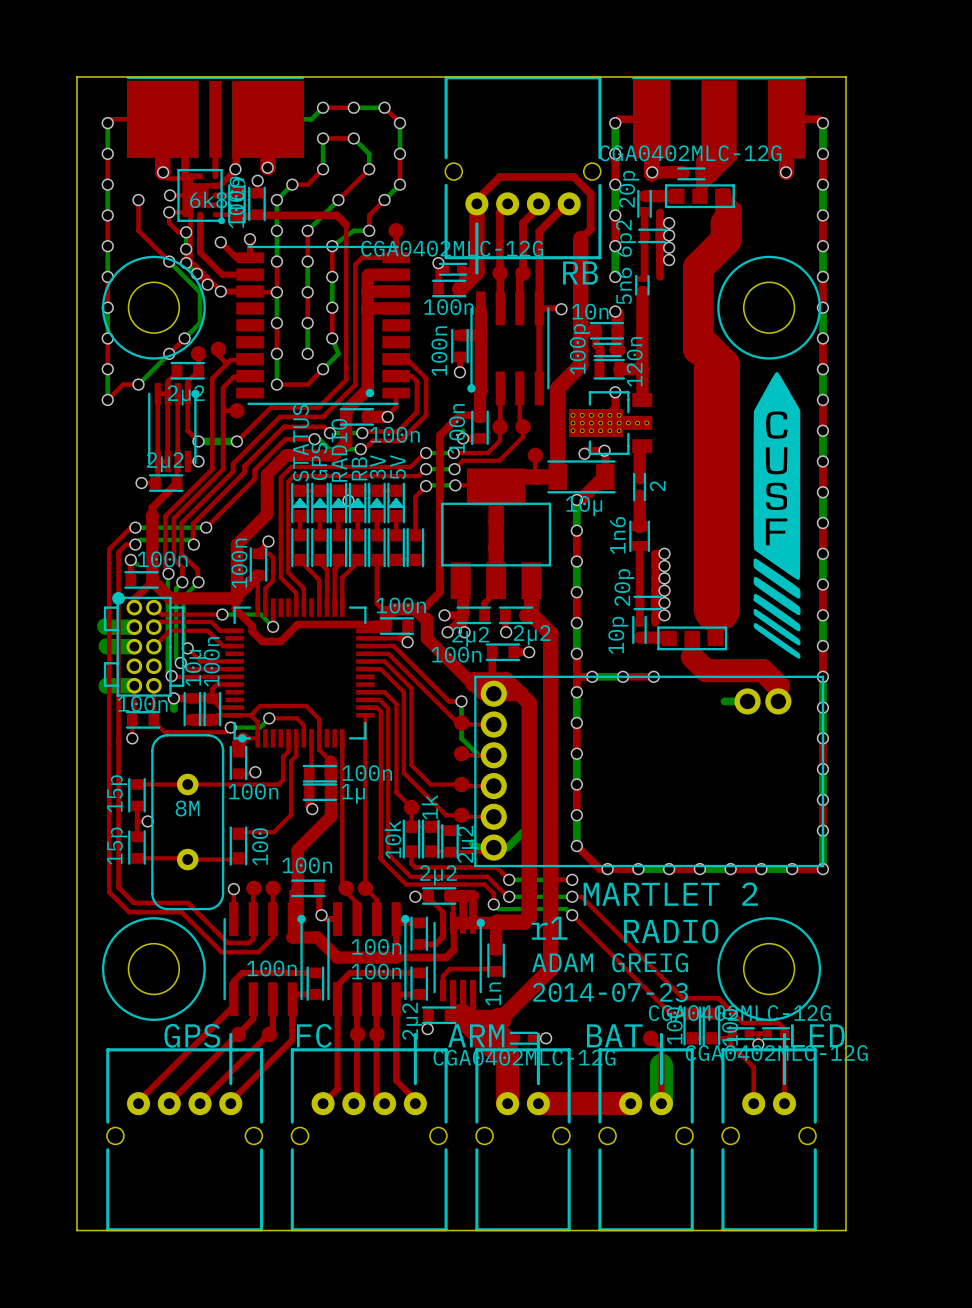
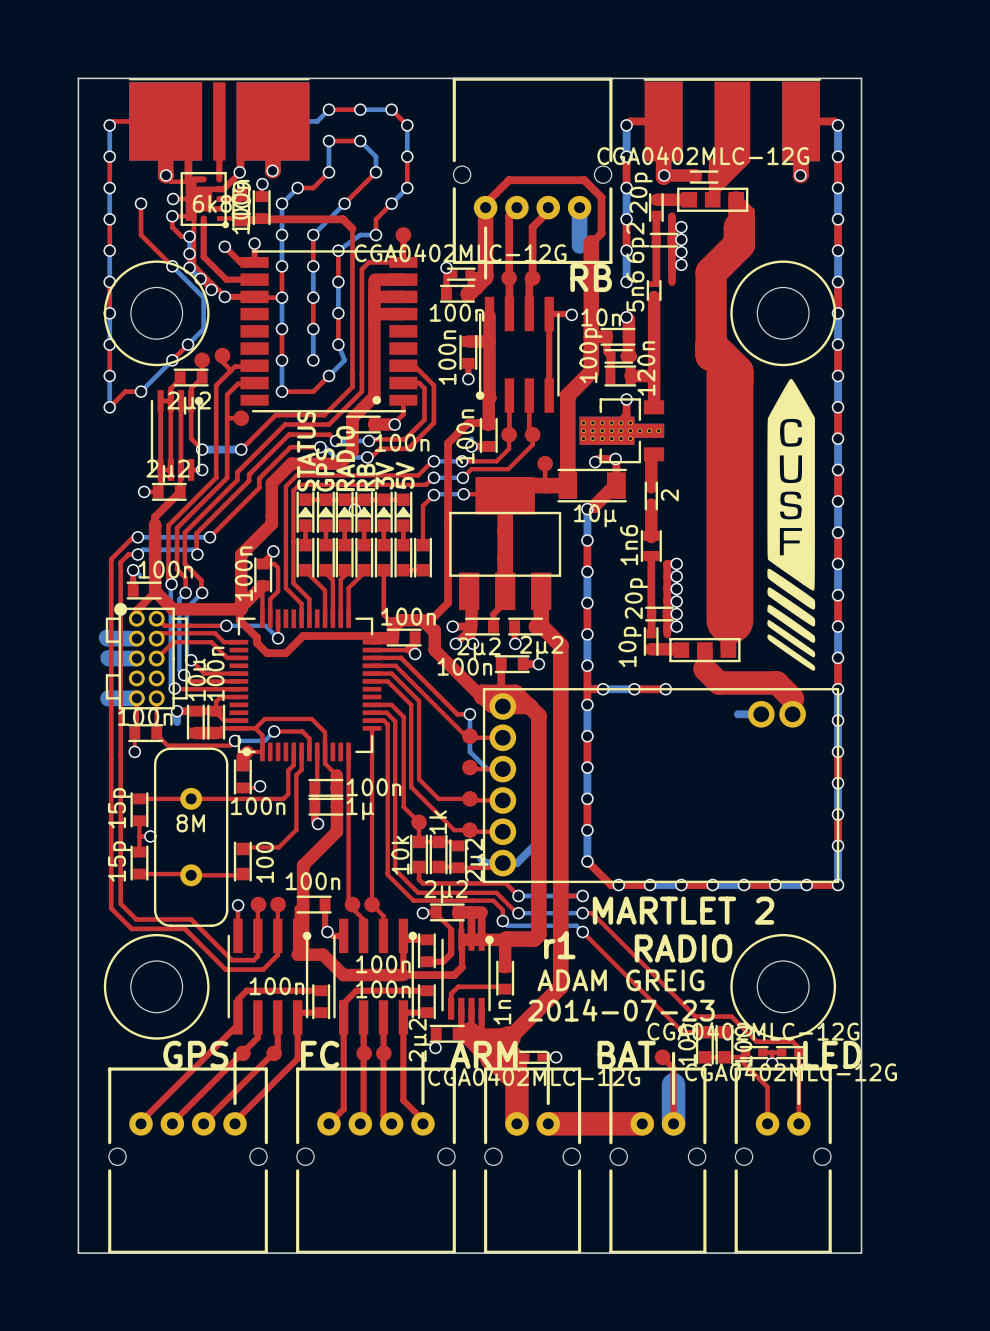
top track: (567, 203) (539, 231) (539, 308) -> none
bottom track: none -> (579, 207) (579, 245)

